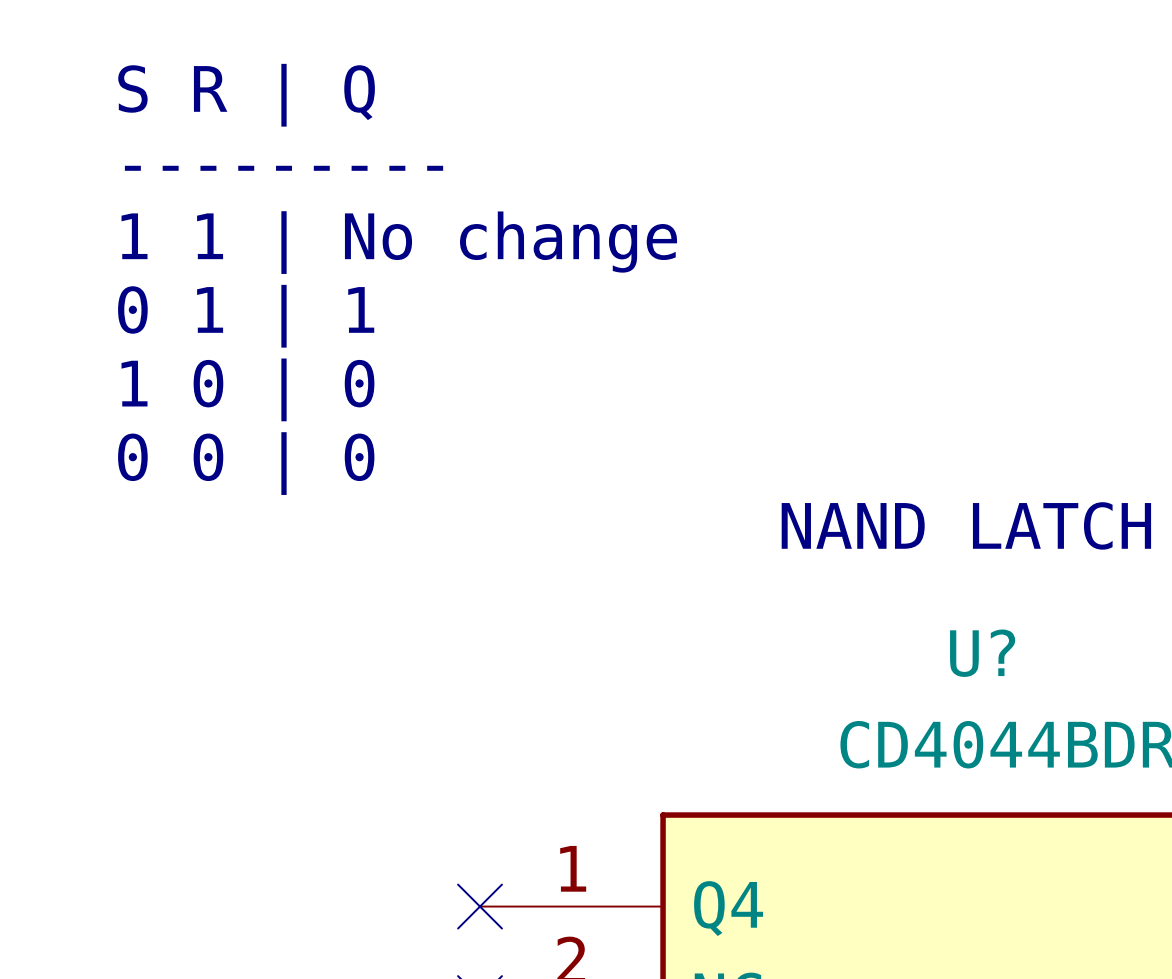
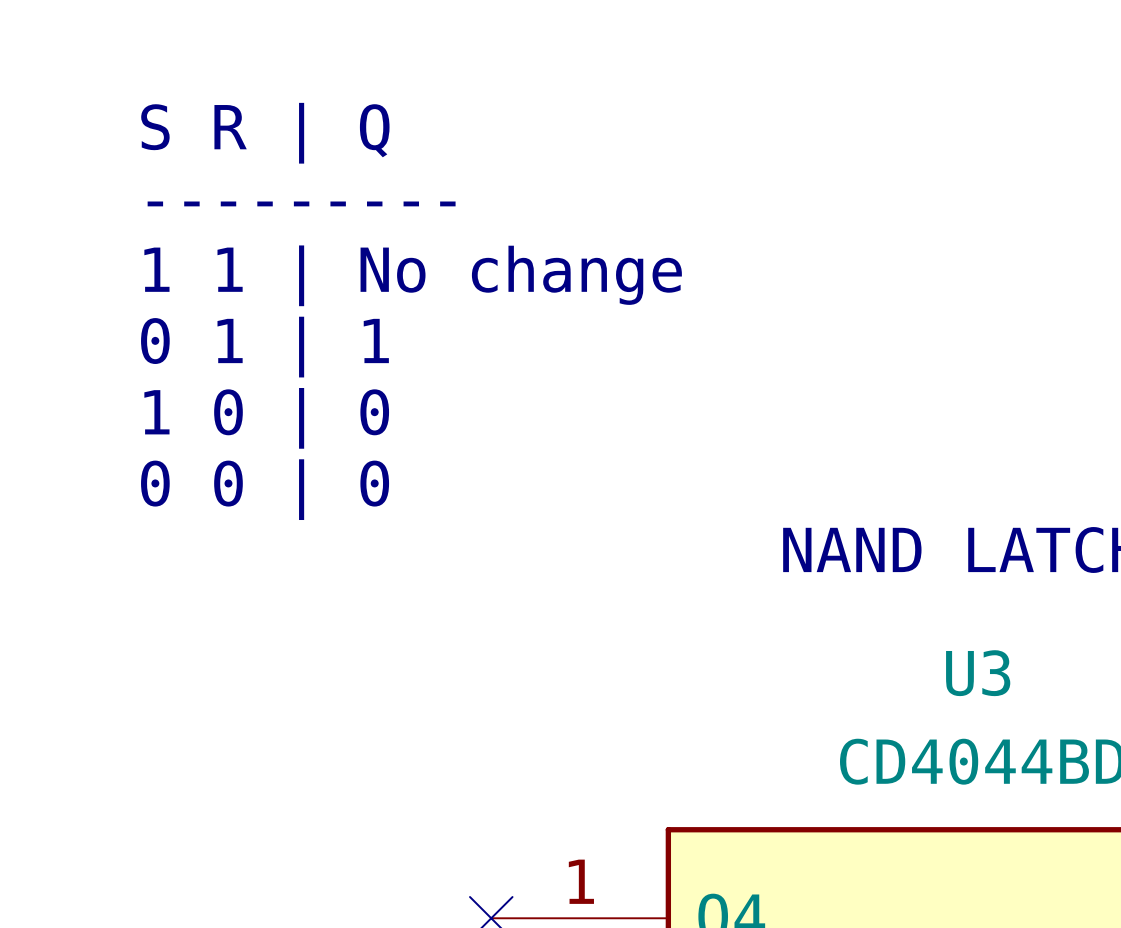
U? name: U? (982, 653) -> U3 (978, 673)

